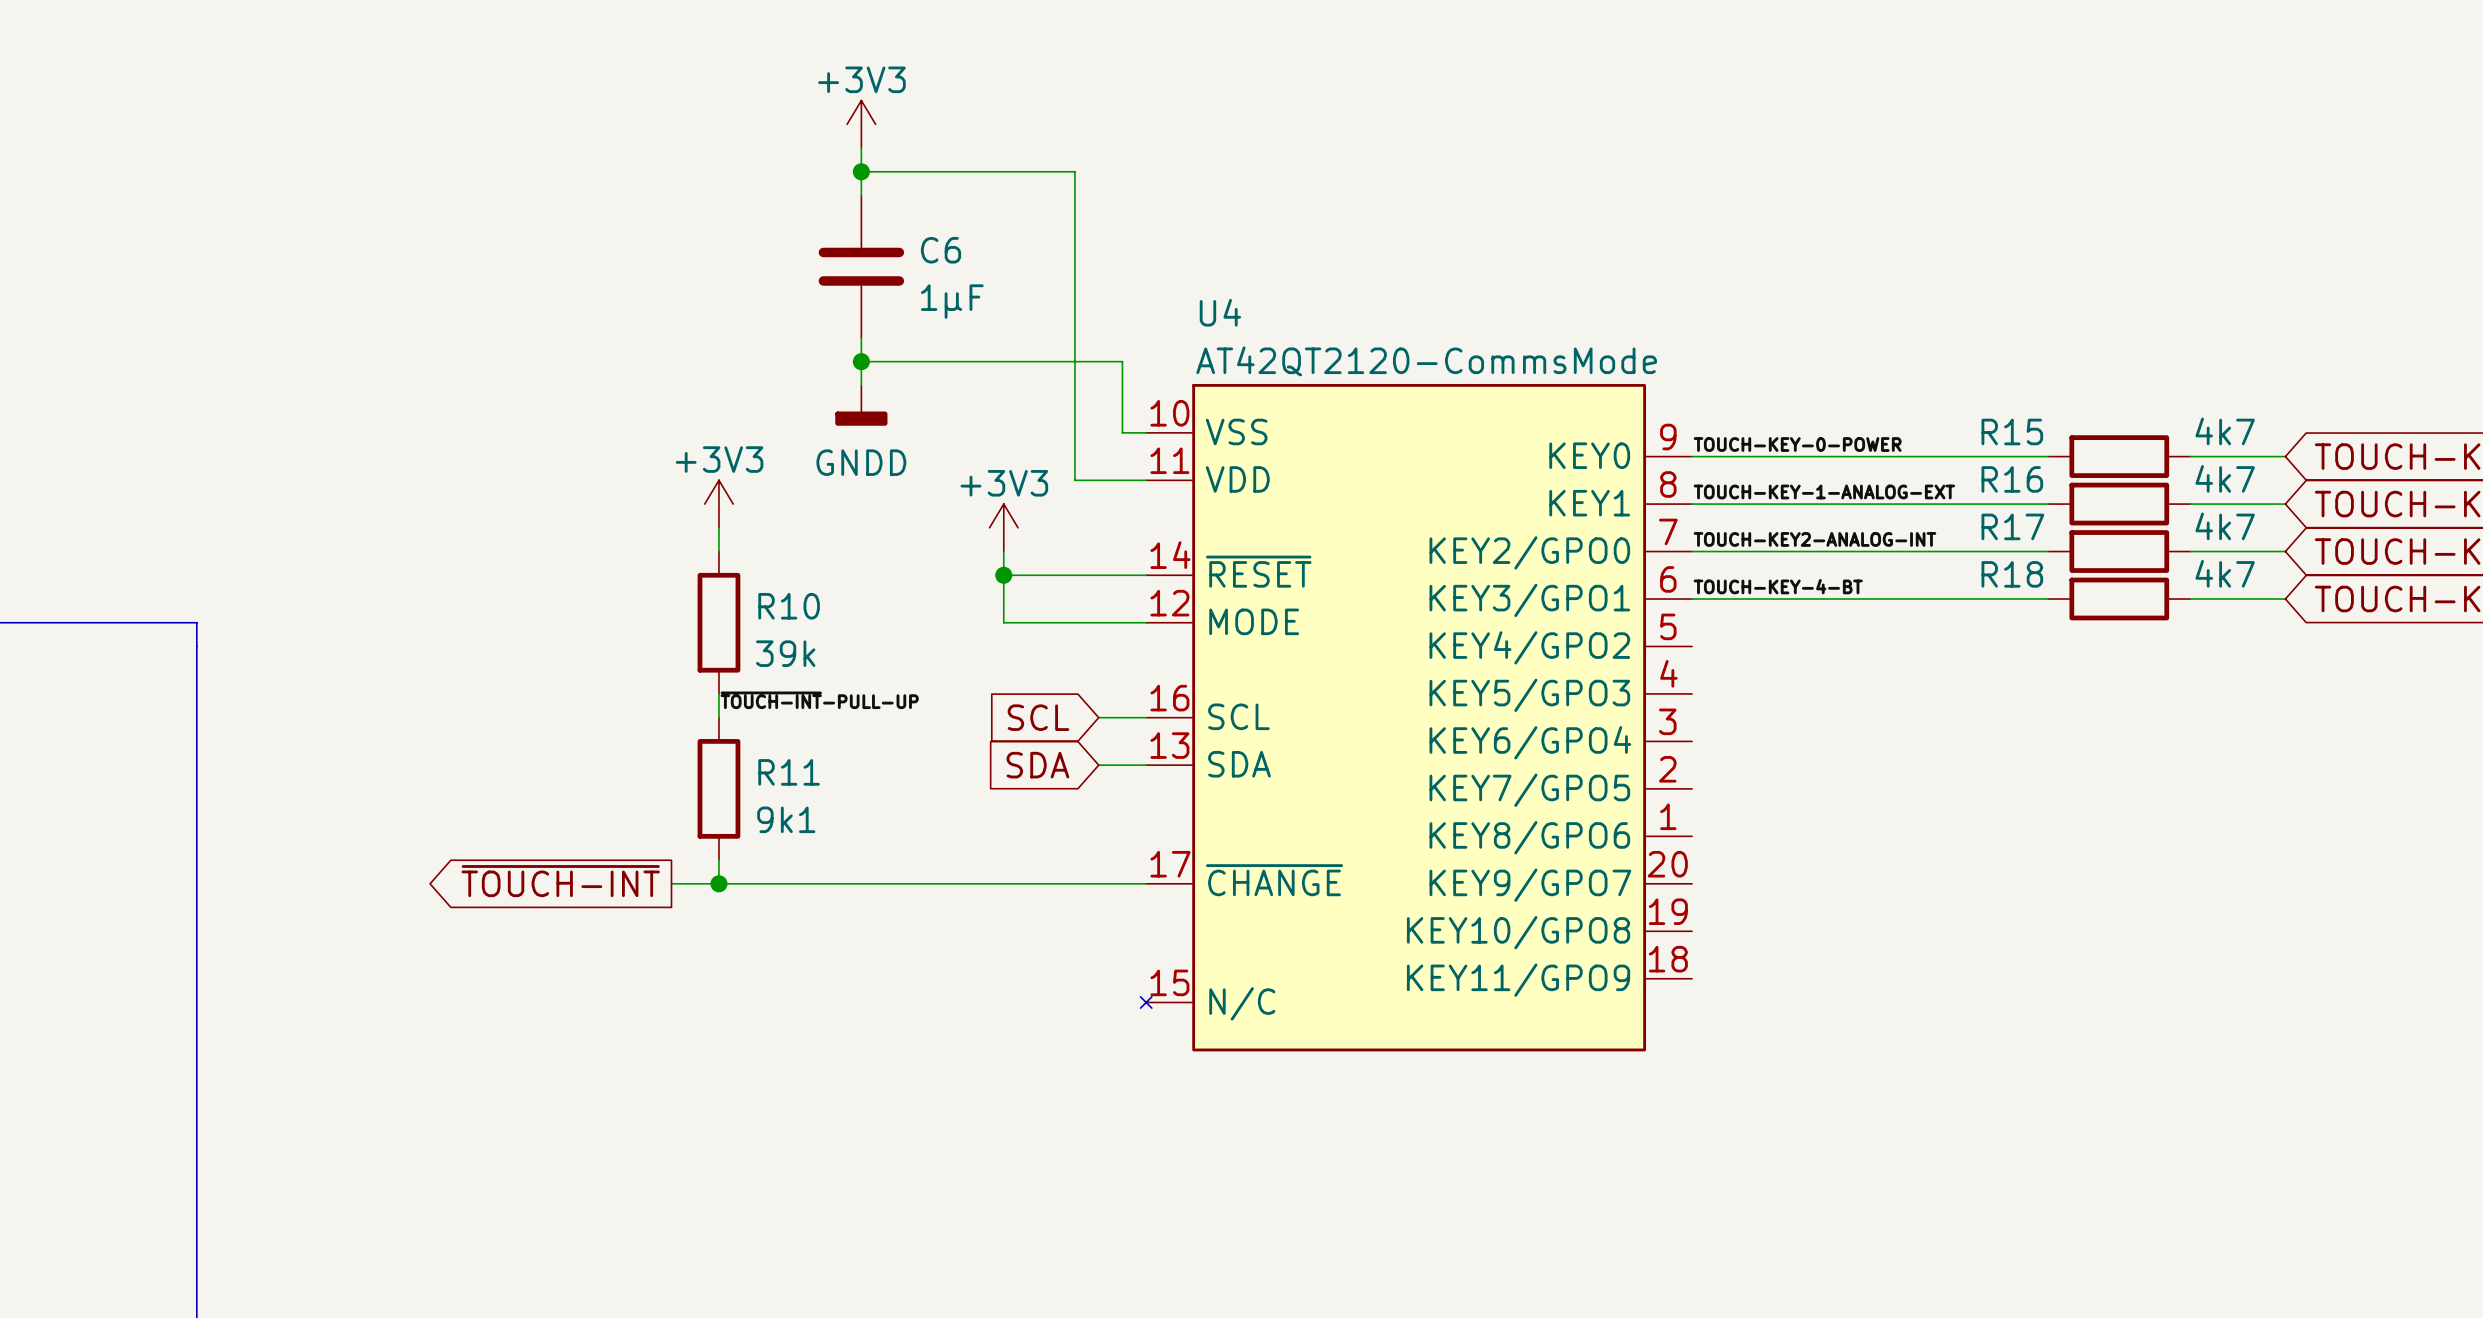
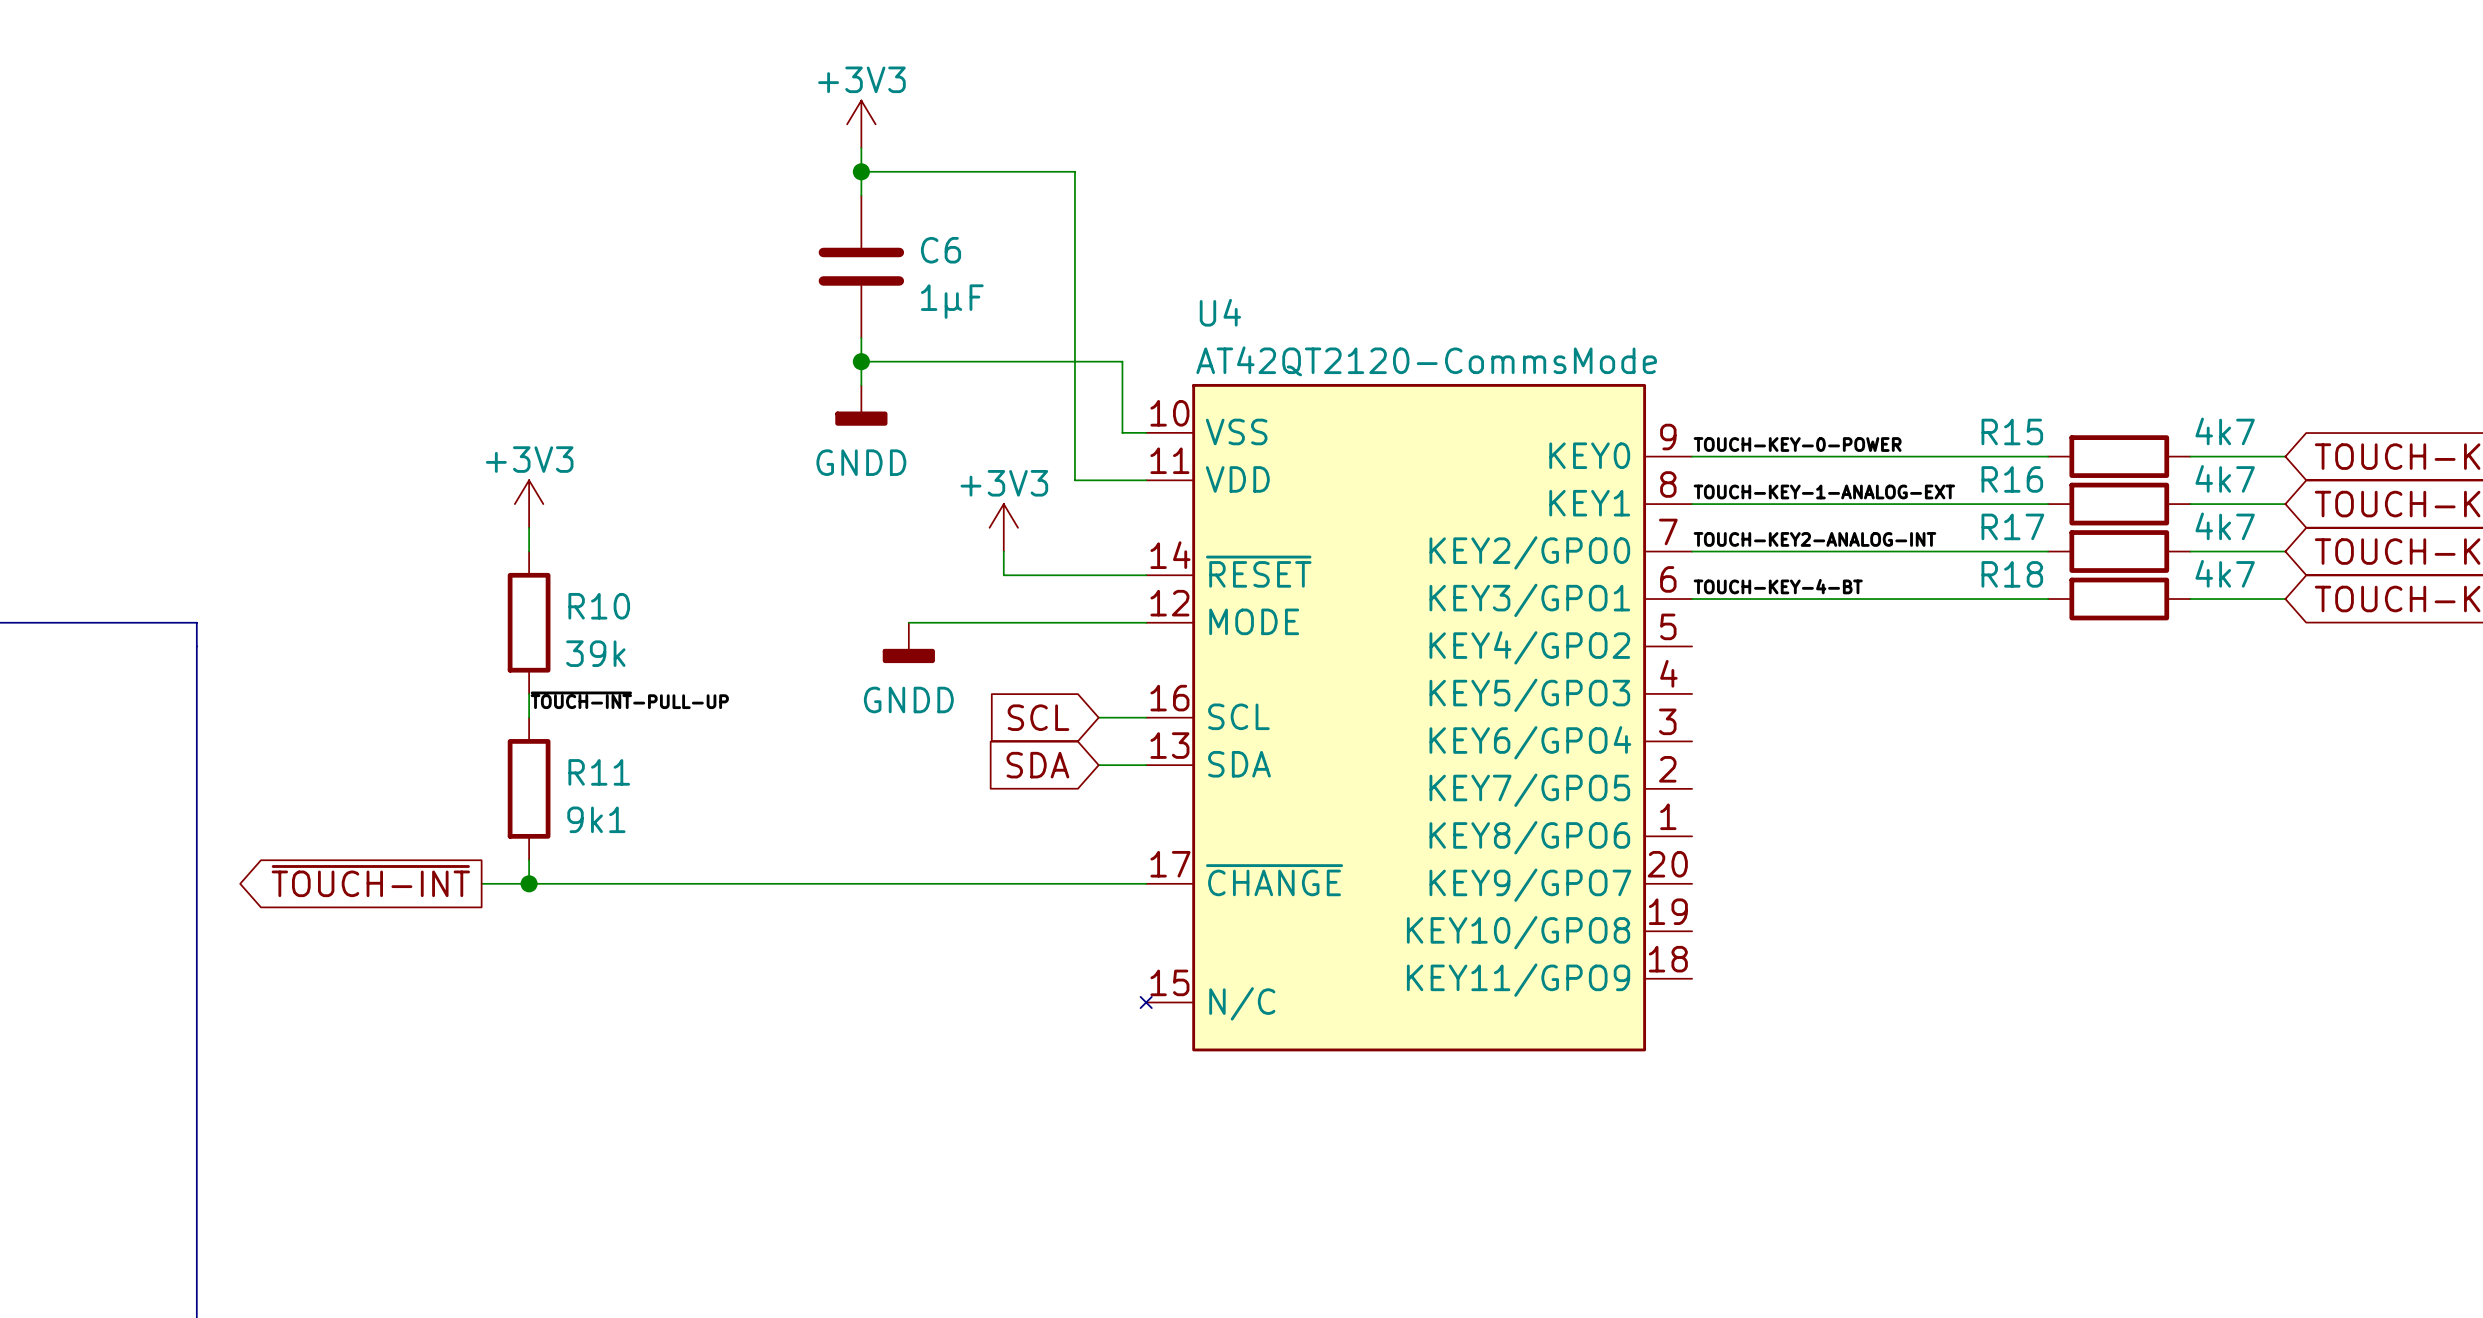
power symbol position: +3V3 (718, 504) -> +3V3 (529, 504)
wire: (718, 527) (718, 551) -> (529, 527) (529, 551)
wire: (1003, 575) (1003, 622) -> (908, 622) (1003, 622)
junction: (1003, 575) -> none
R10 position: (718, 622) -> (529, 622)
power symbol: none -> GNDD (908, 642)
wire: (718, 693) (718, 717) -> (529, 693) (529, 717)
label position: ~{TOUCH-INT}-PULL-UP (819, 700) -> ~{TOUCH-INT}-PULL-UP (629, 700)
R11 position: (718, 788) -> (529, 788)
wire: (718, 860) (718, 883) -> (529, 860) (529, 883)
global label position: ~{TOUCH-INT} (560, 881) -> ~{TOUCH-INT} (370, 881)
wire: none -> (481, 883) (671, 883)
junction: none -> (529, 883)
junction: (718, 883) -> none

